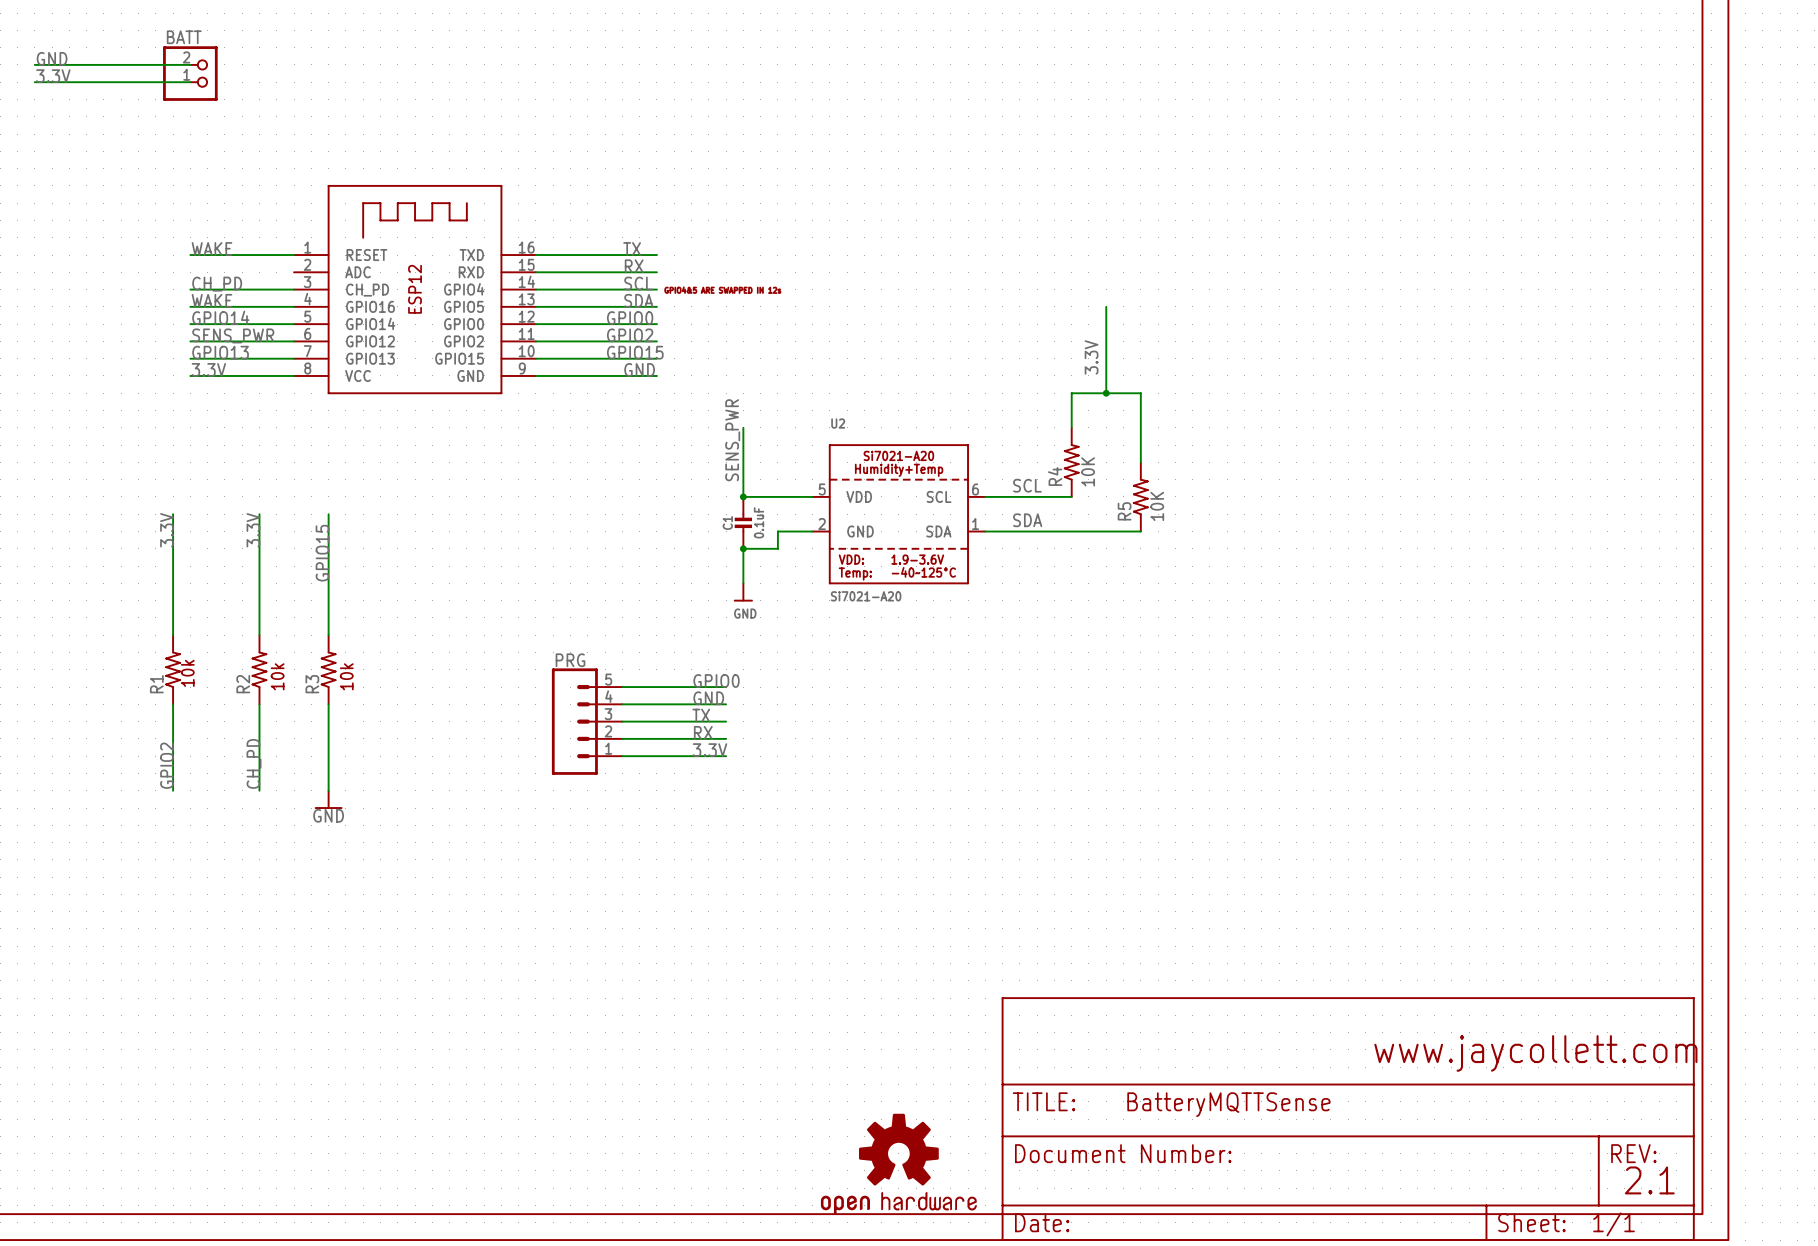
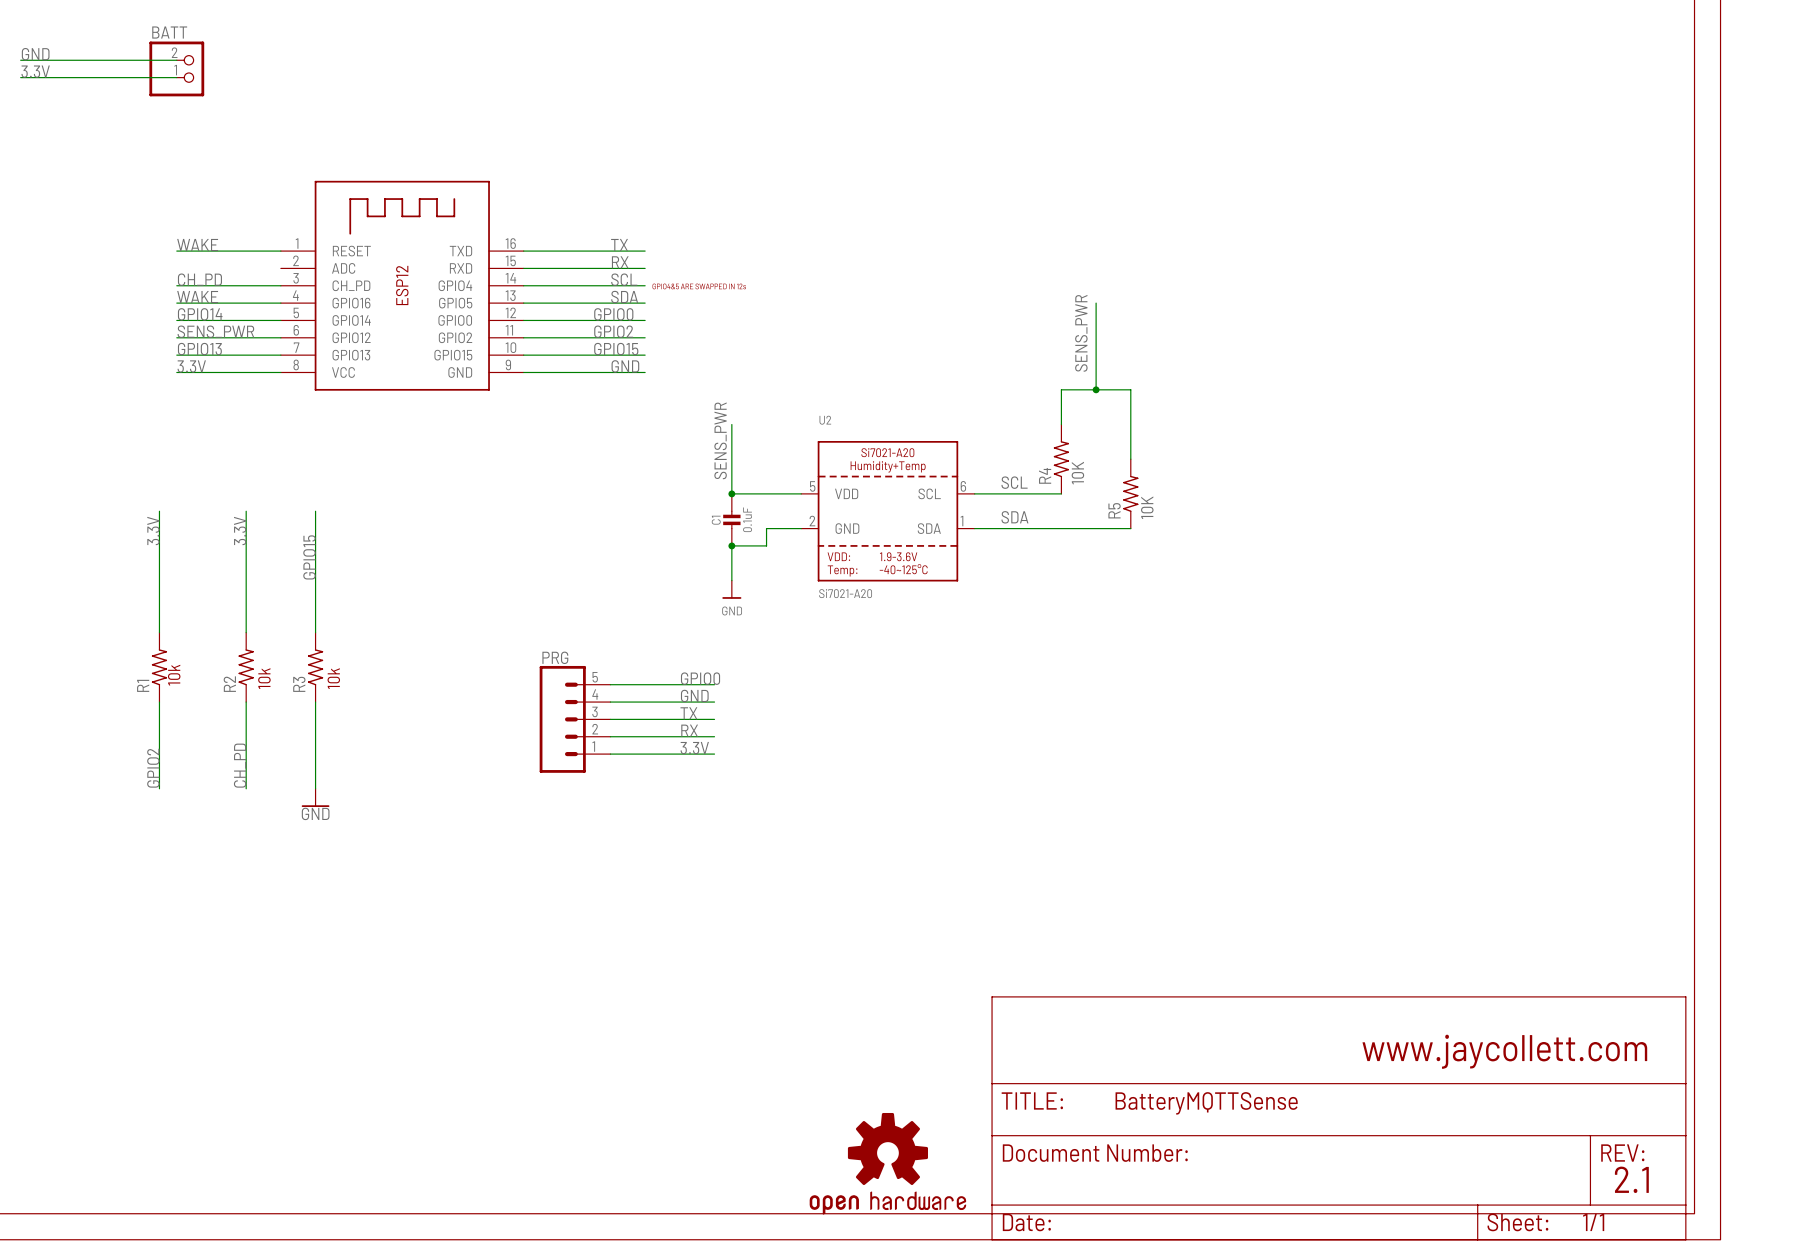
label: 3.3V (1091, 357) -> SENS_PWR (1081, 333)

